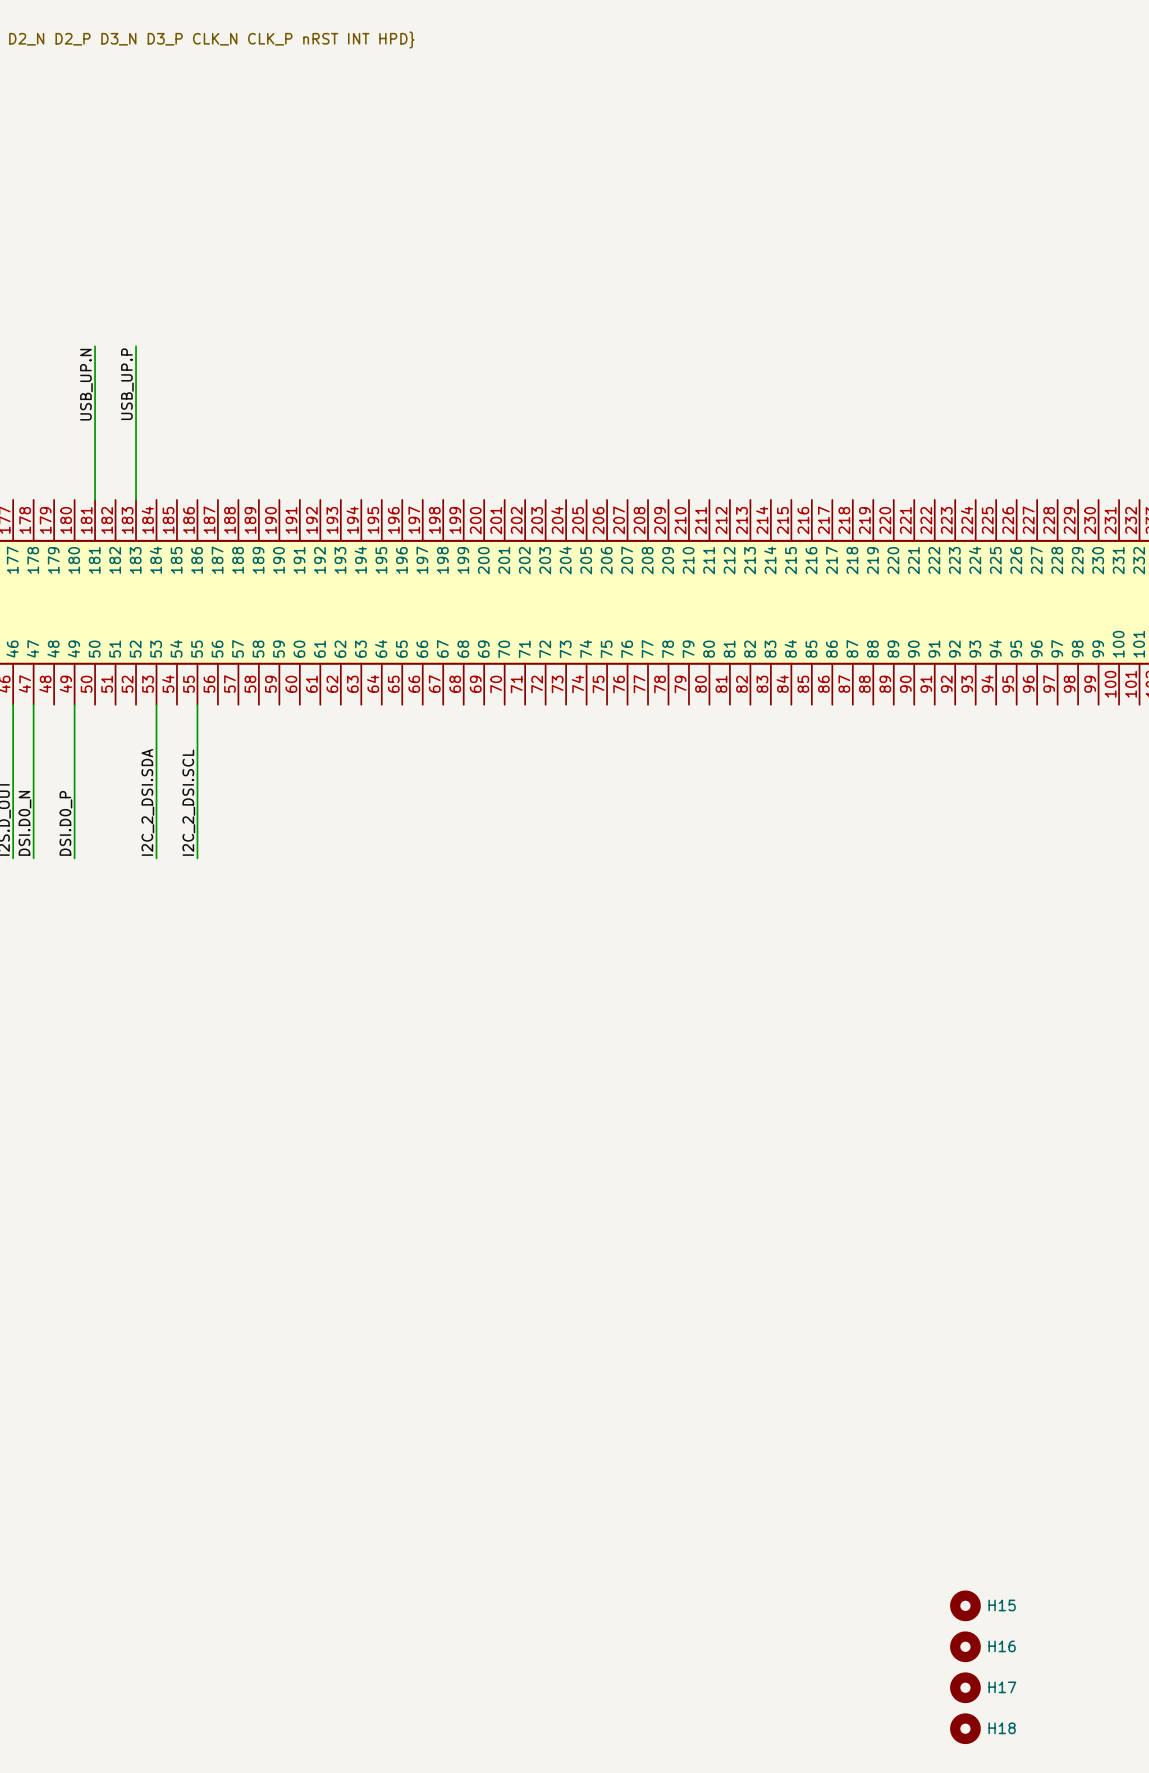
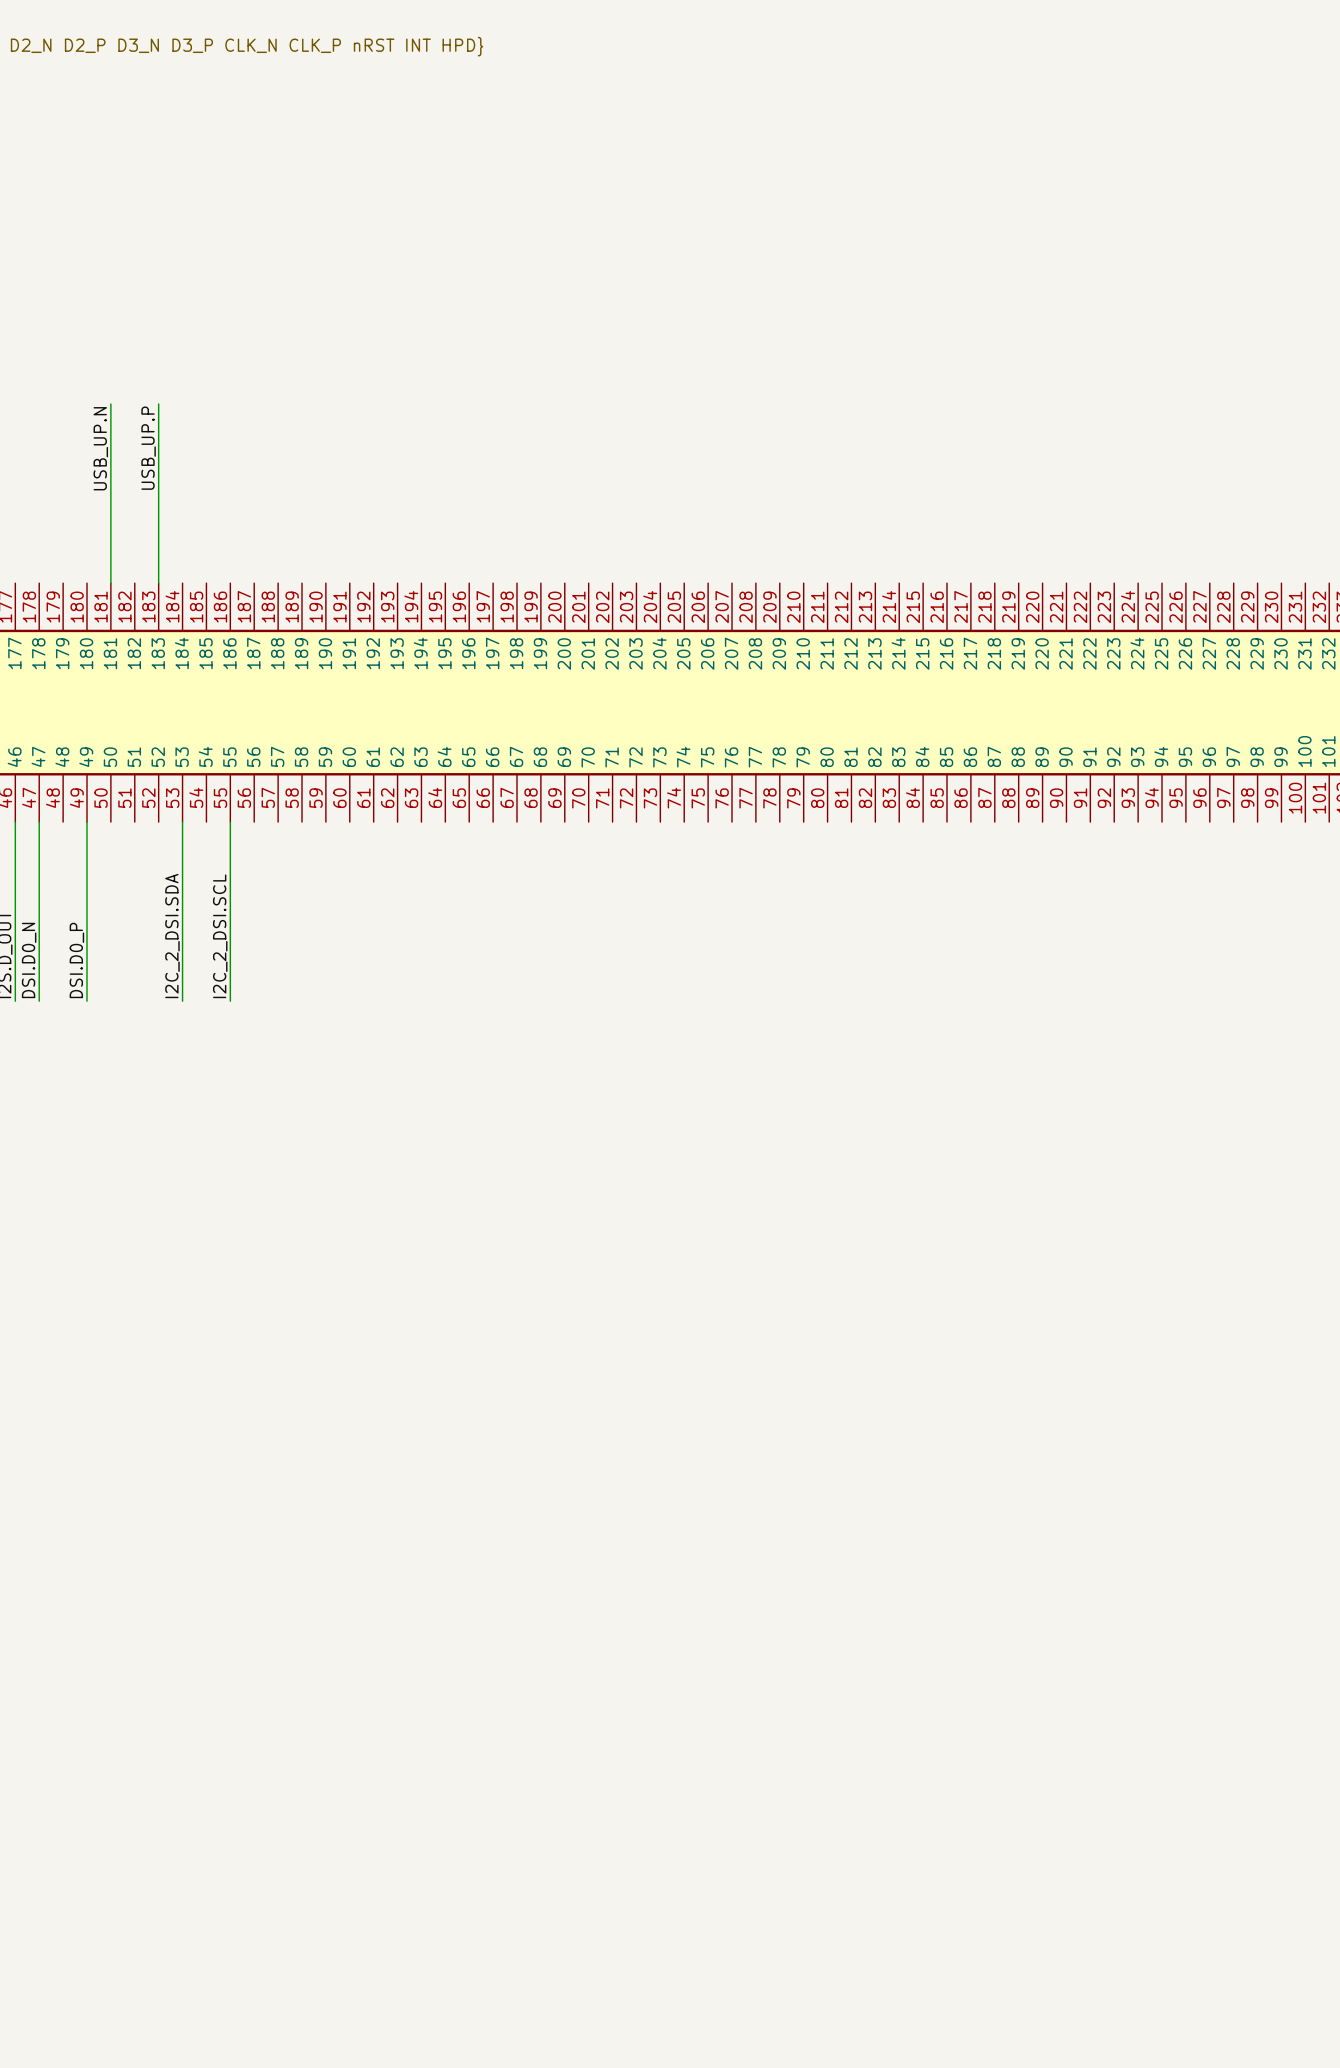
H15: (965, 1605) -> none
H16: (965, 1646) -> none
H17: (965, 1687) -> none
H18: (965, 1728) -> none

